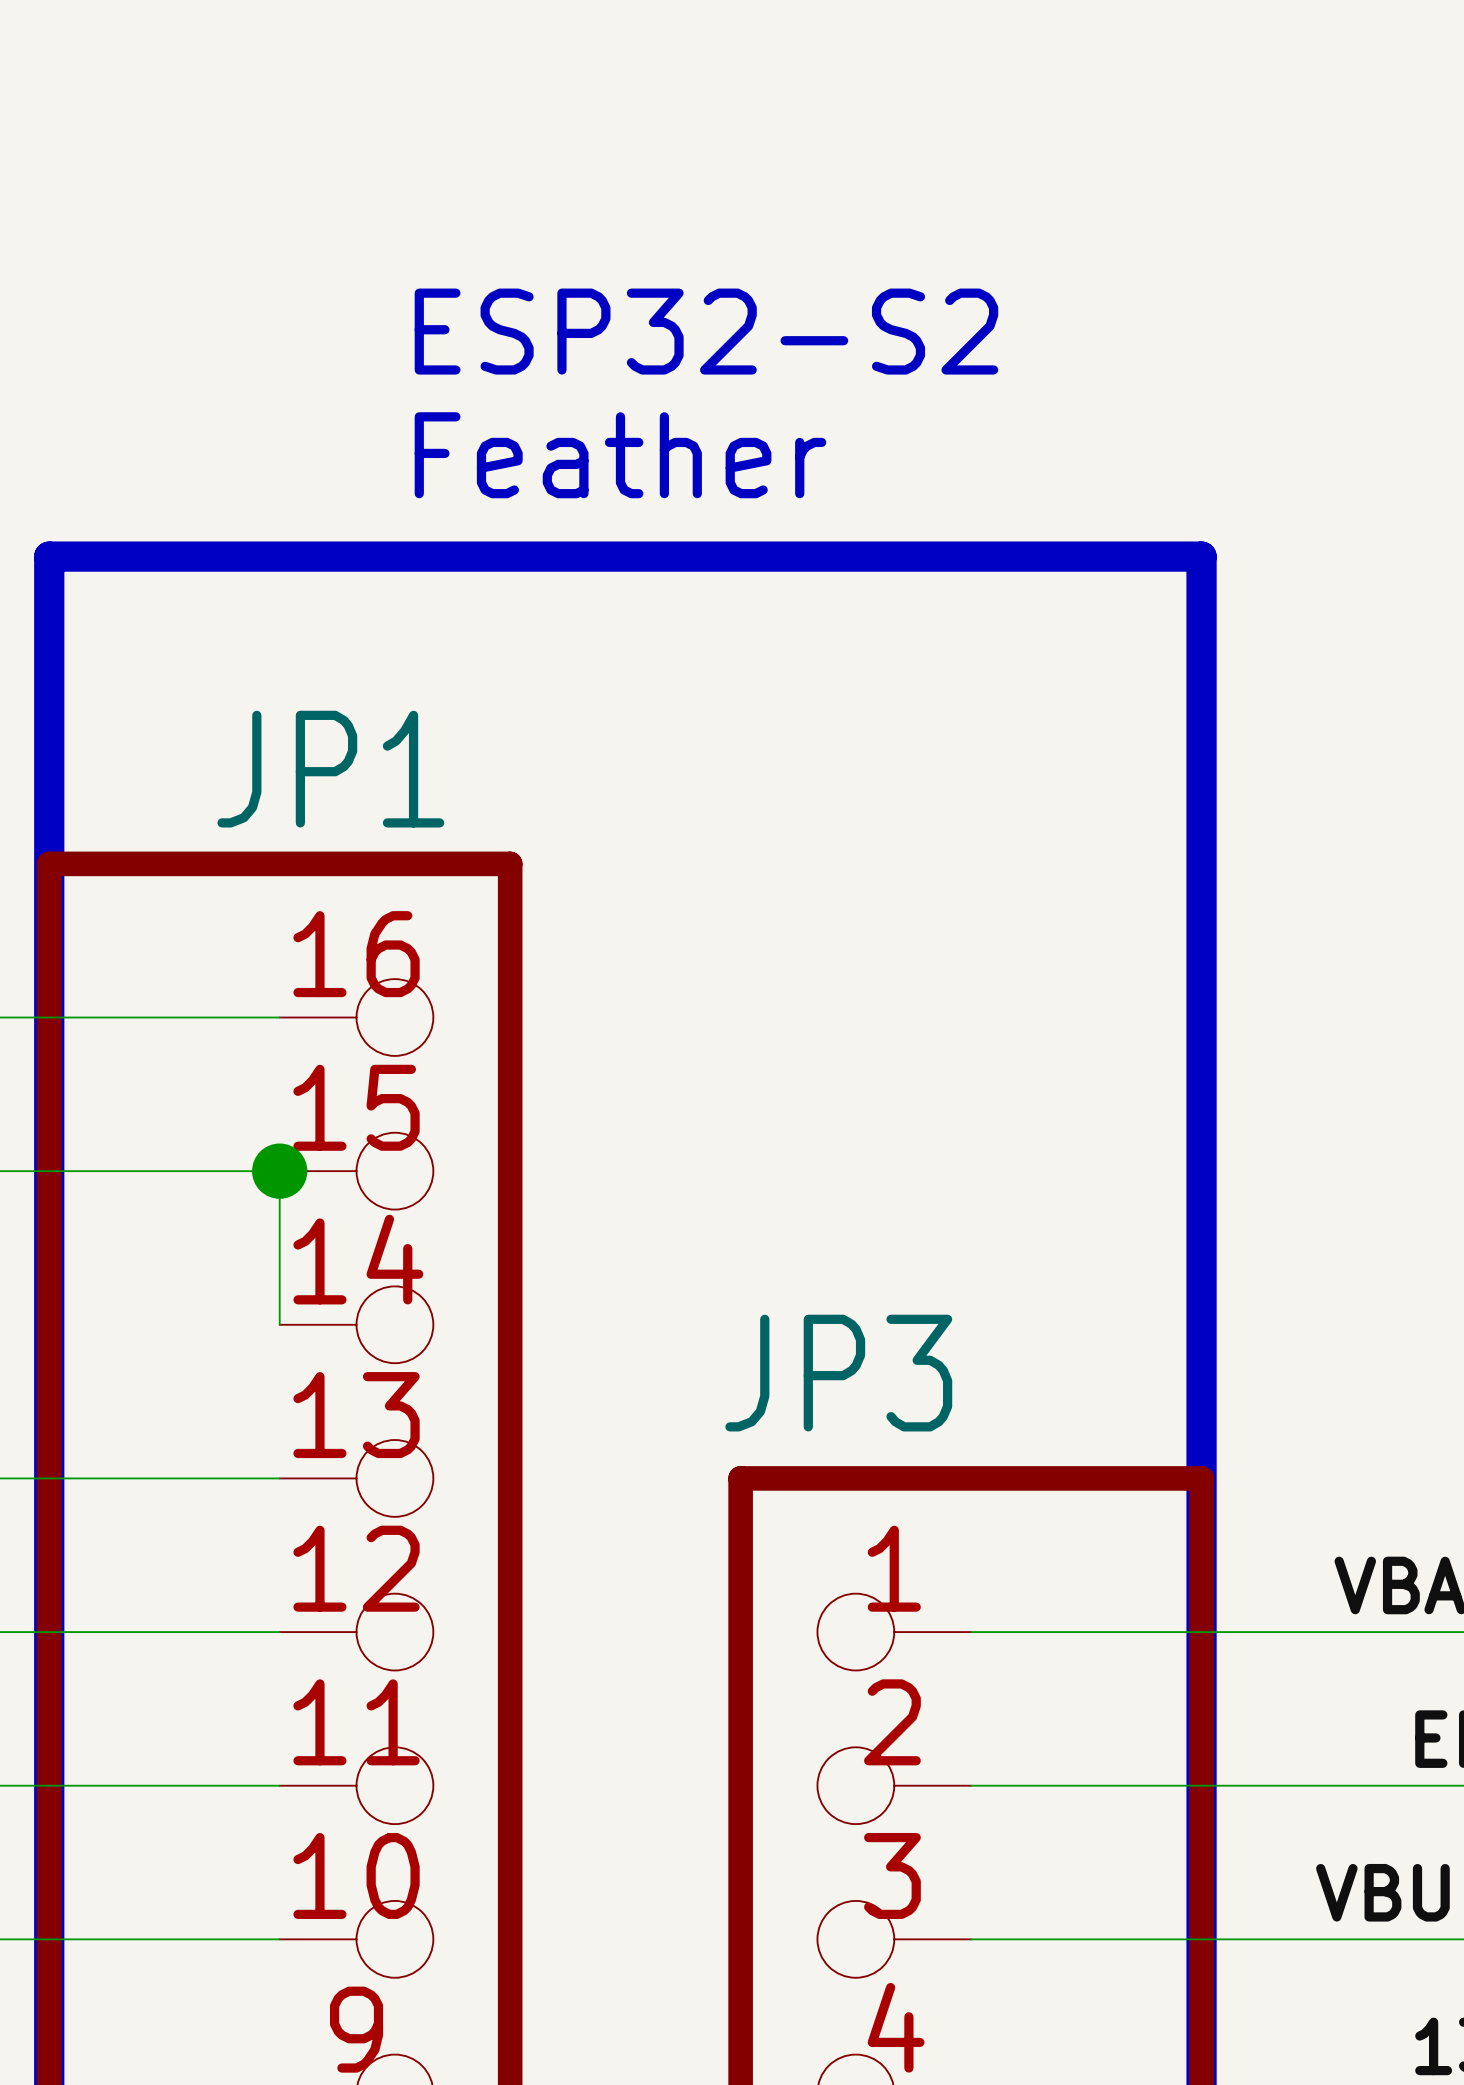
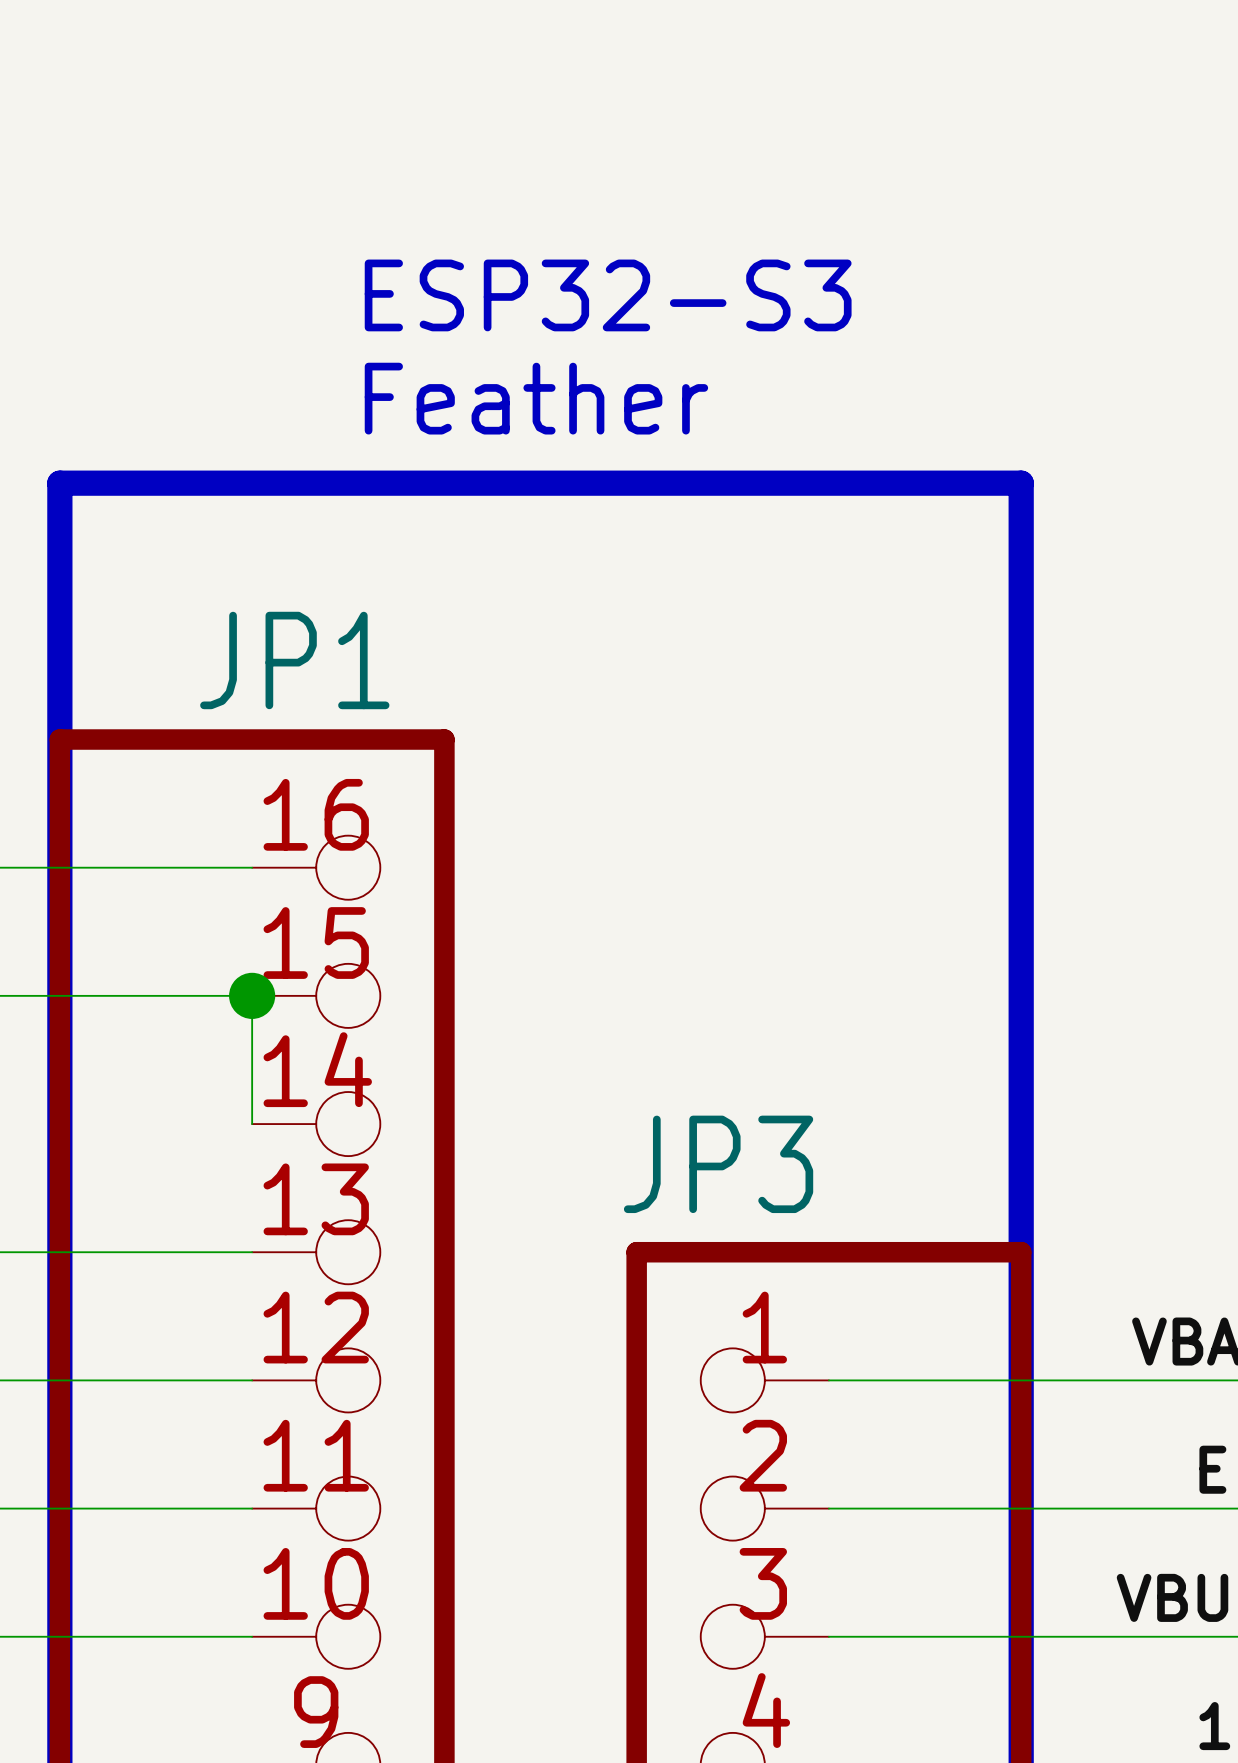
text: ESP32-S2 (706, 331) -> ESP32-S3 (608, 295)

